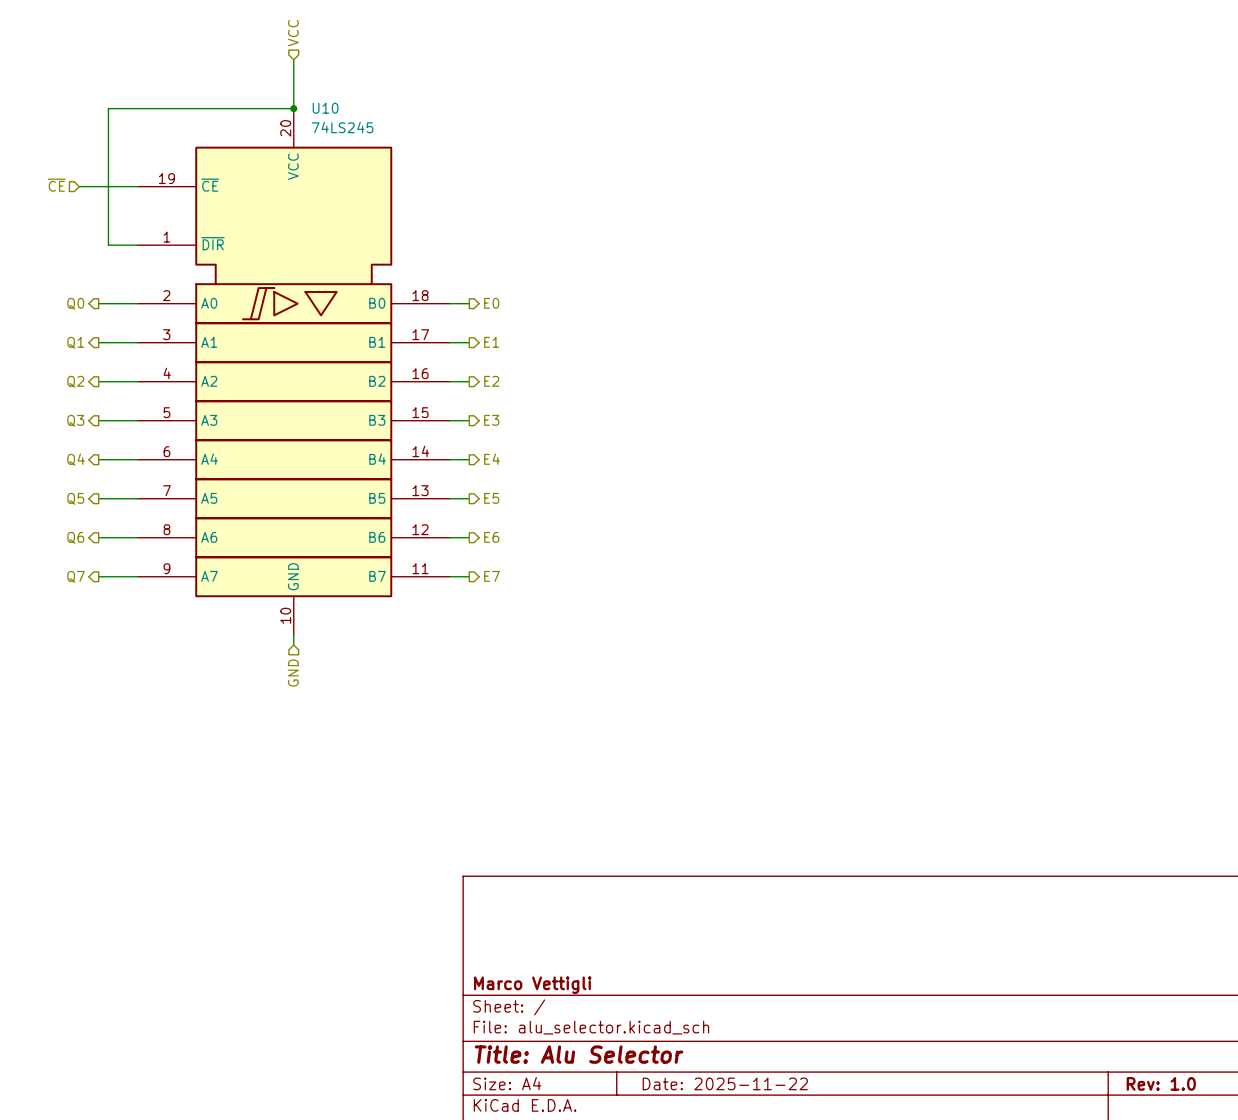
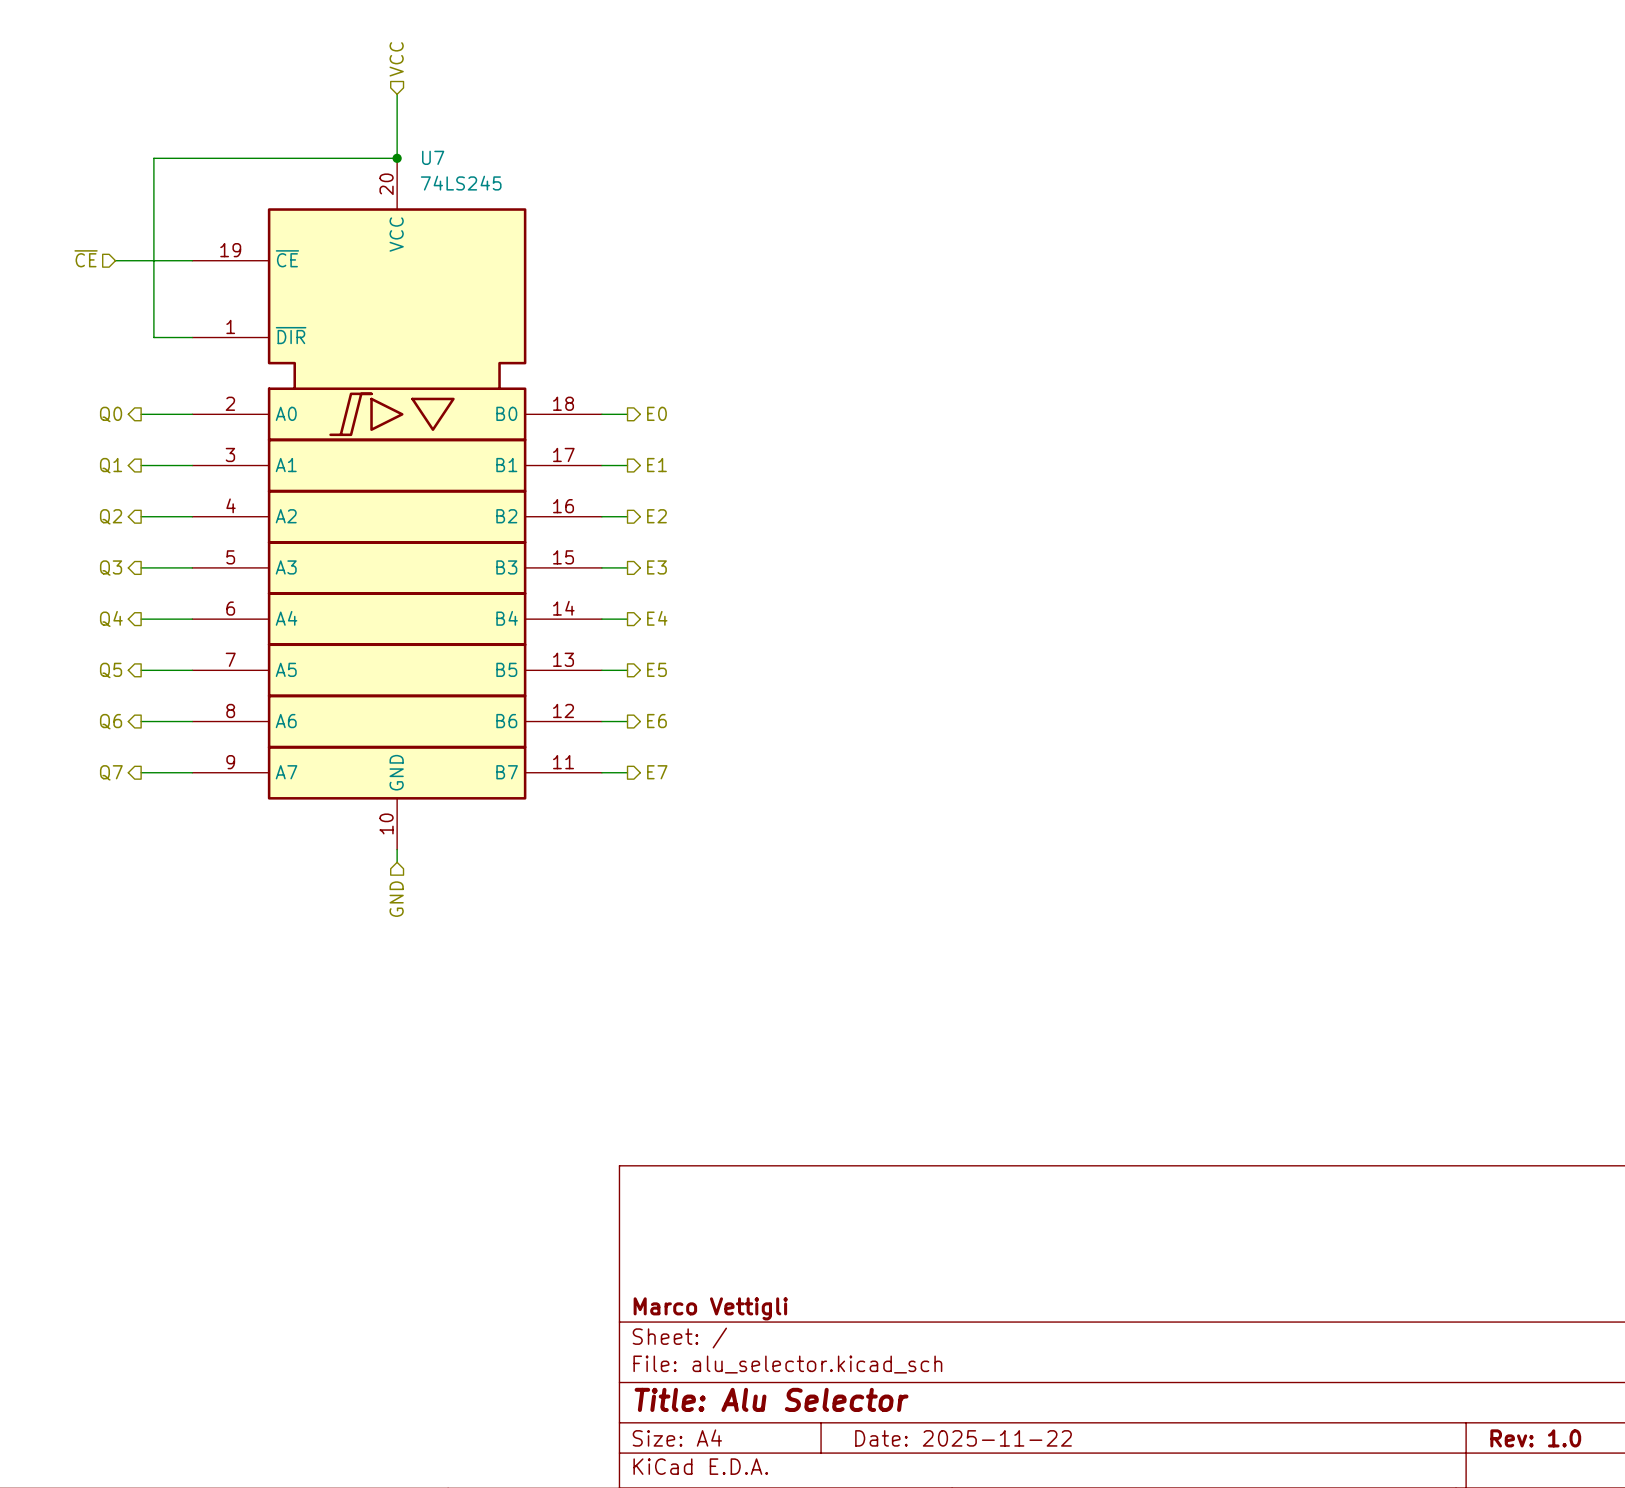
U10 name: U10 (325, 108) -> U7 (433, 157)

